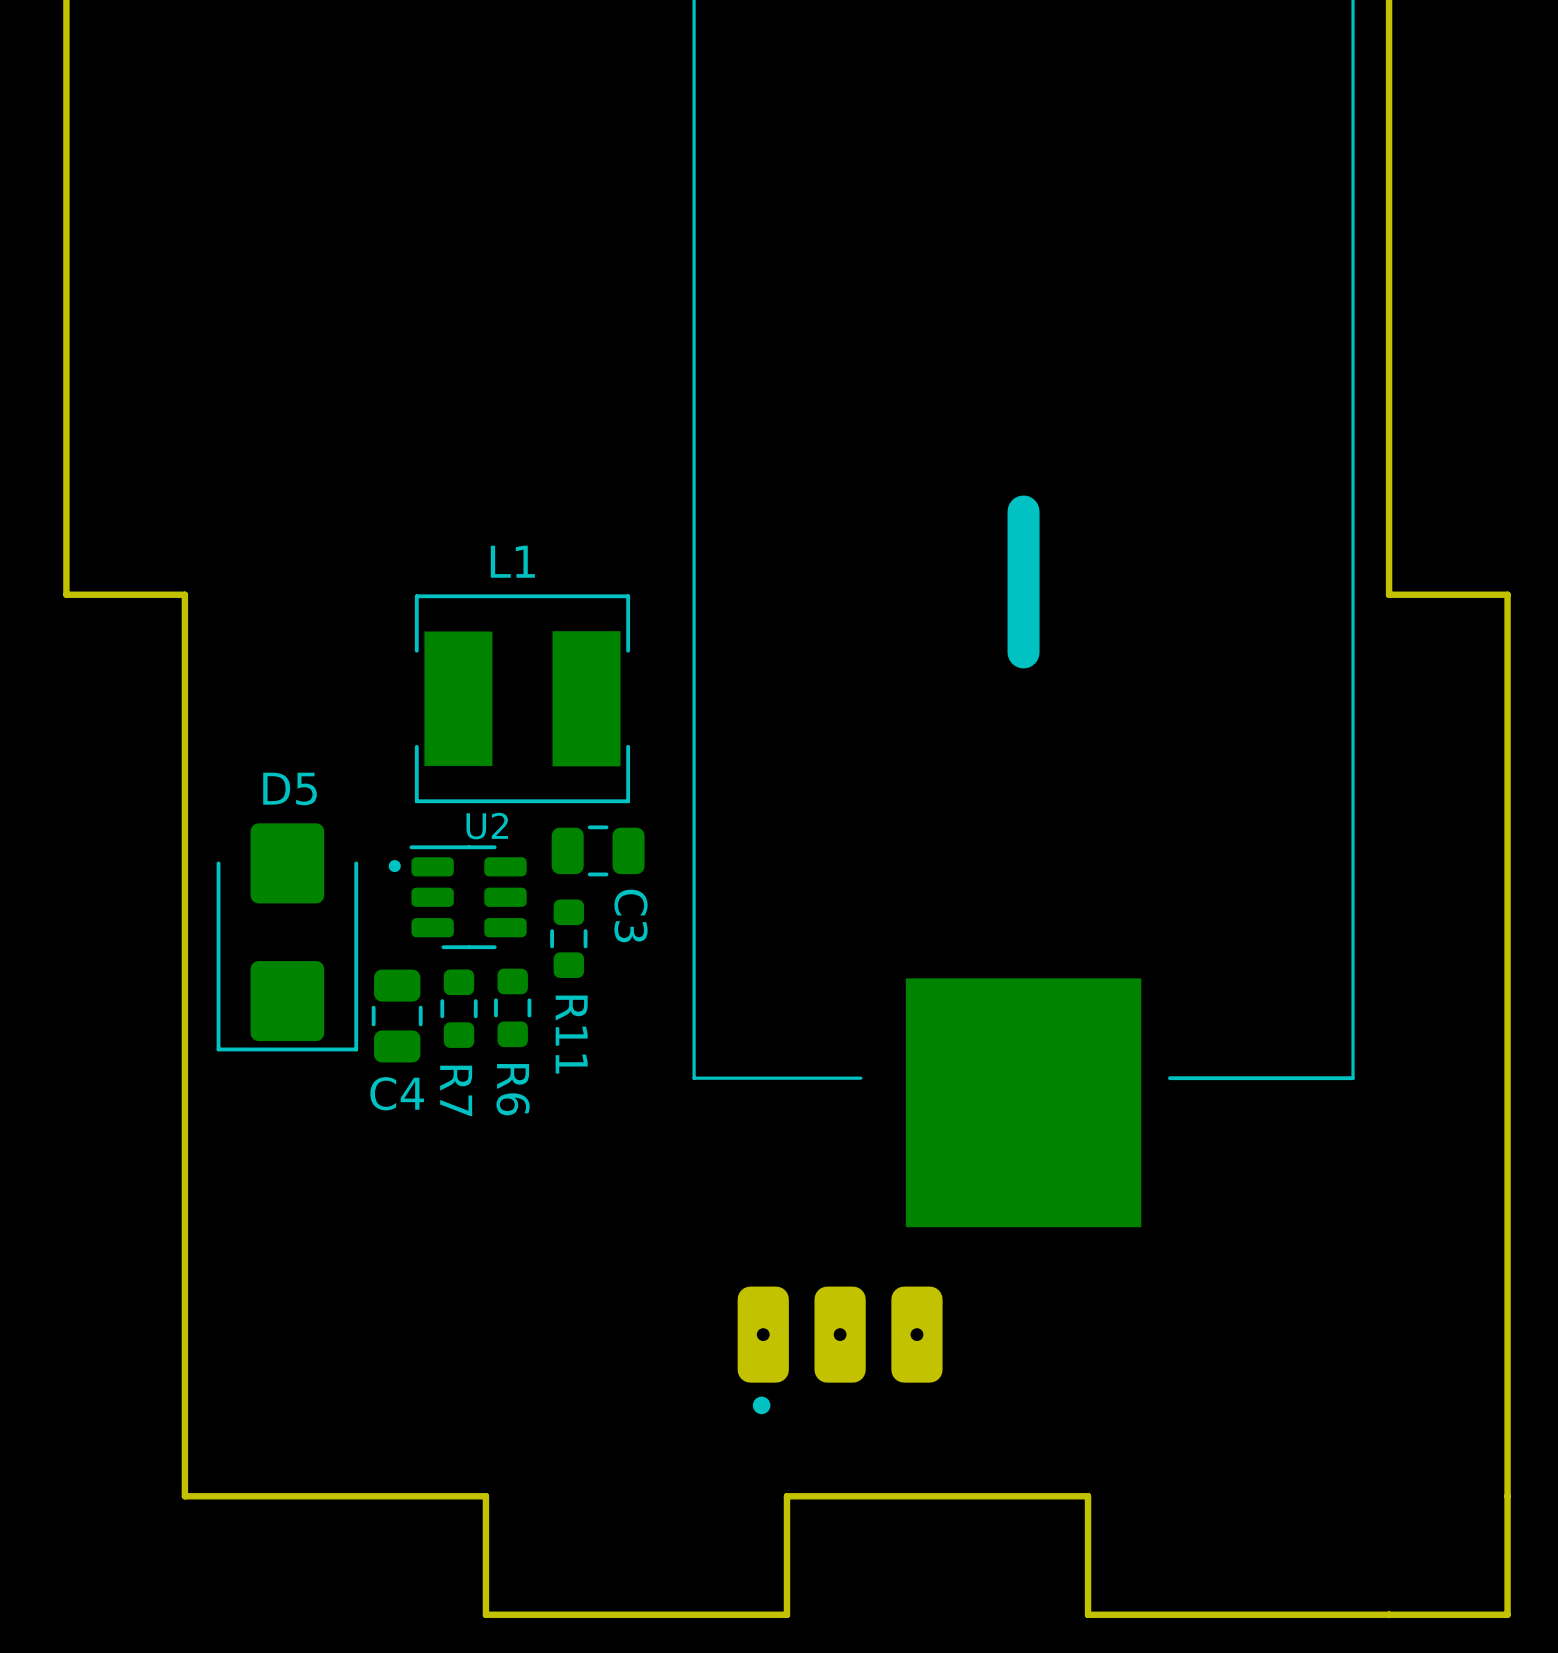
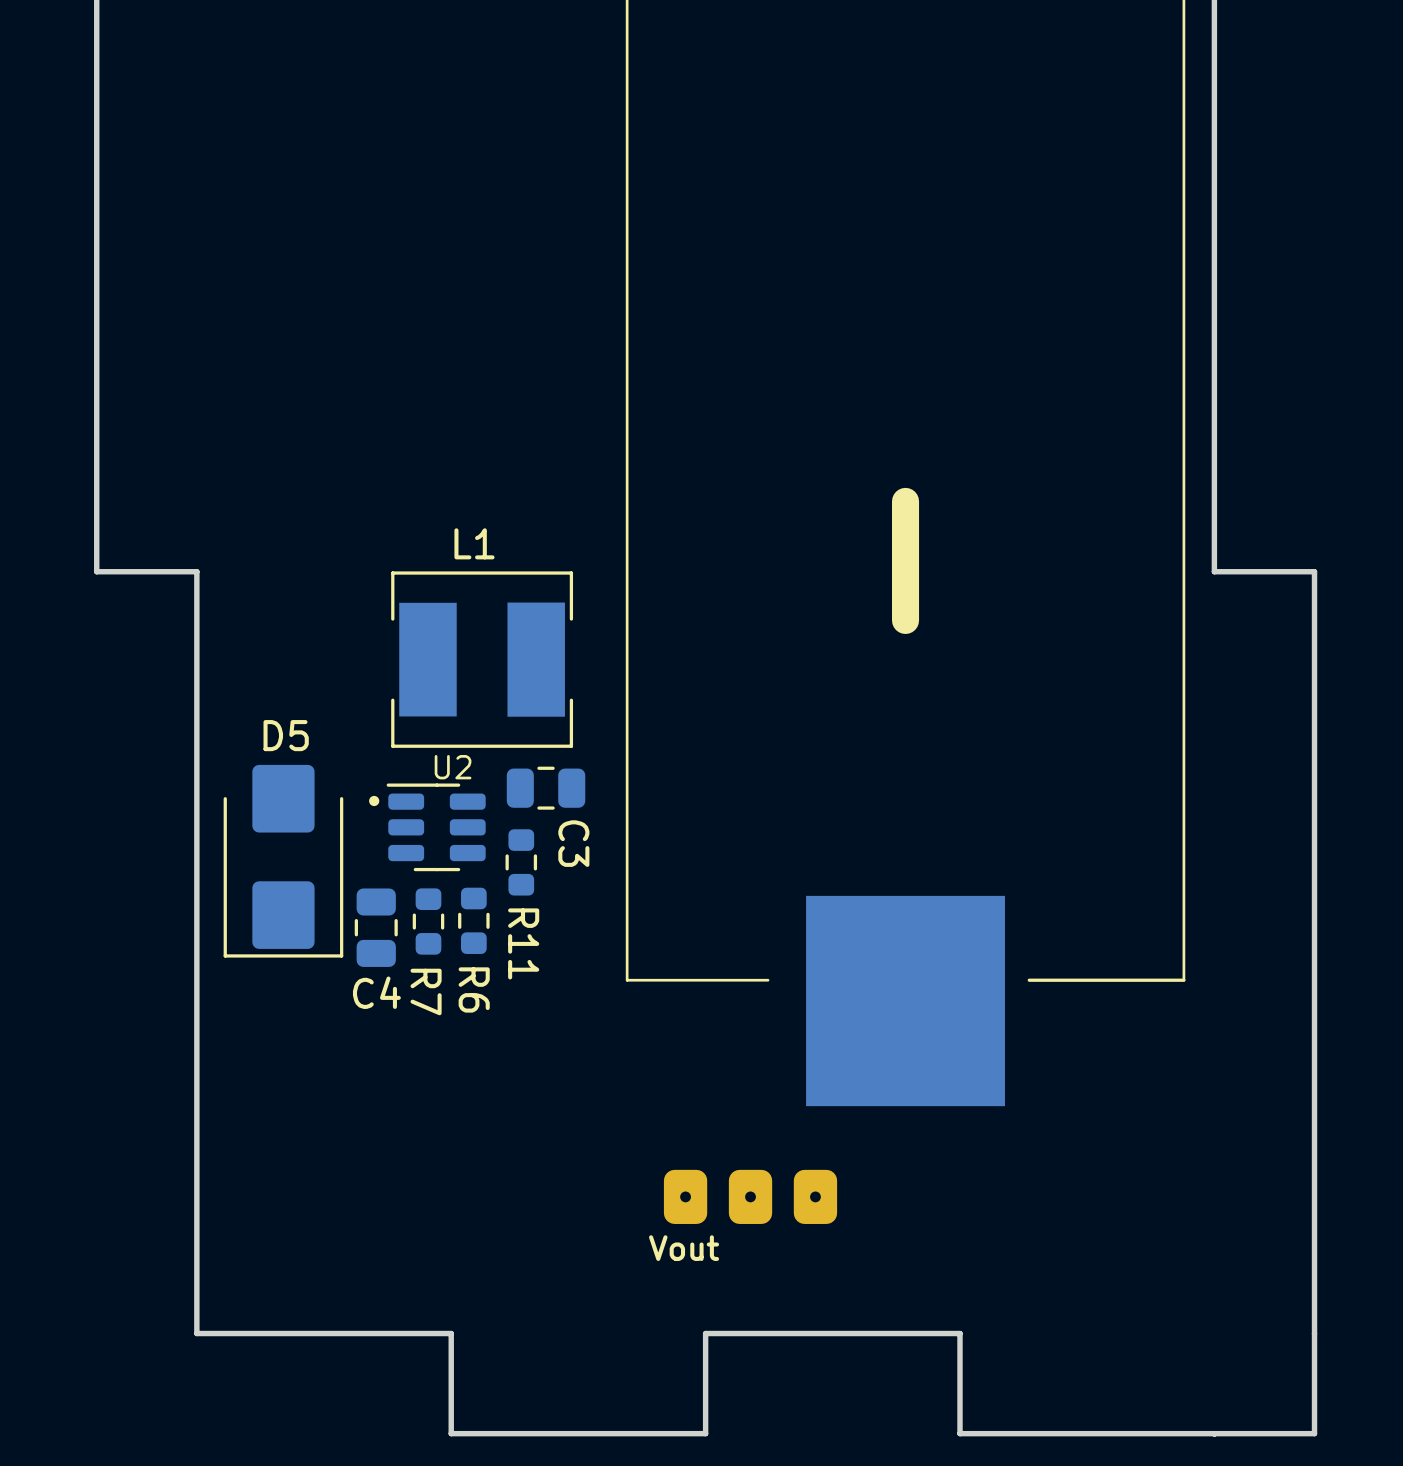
part footprint: [737, 1286, 943, 1383] -> [663, 1169, 838, 1224]
drawing: [752, 1396, 771, 1415] -> none

